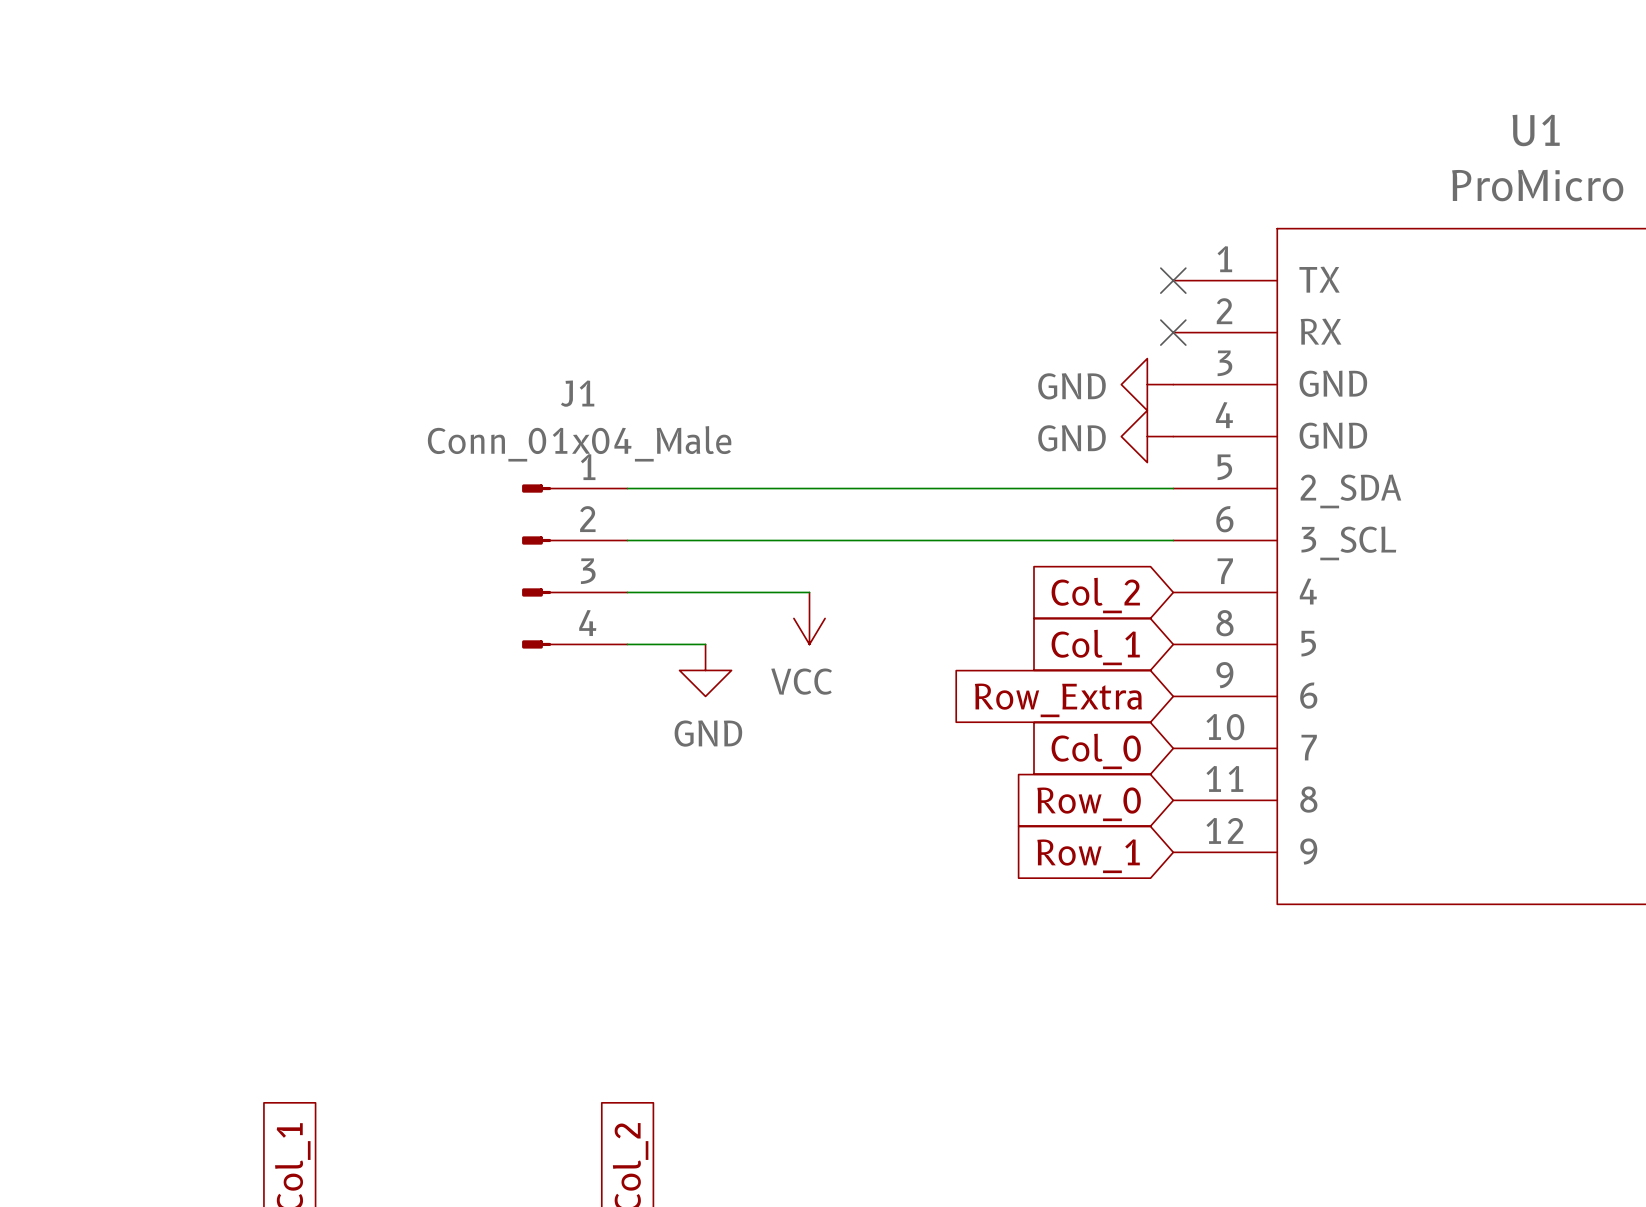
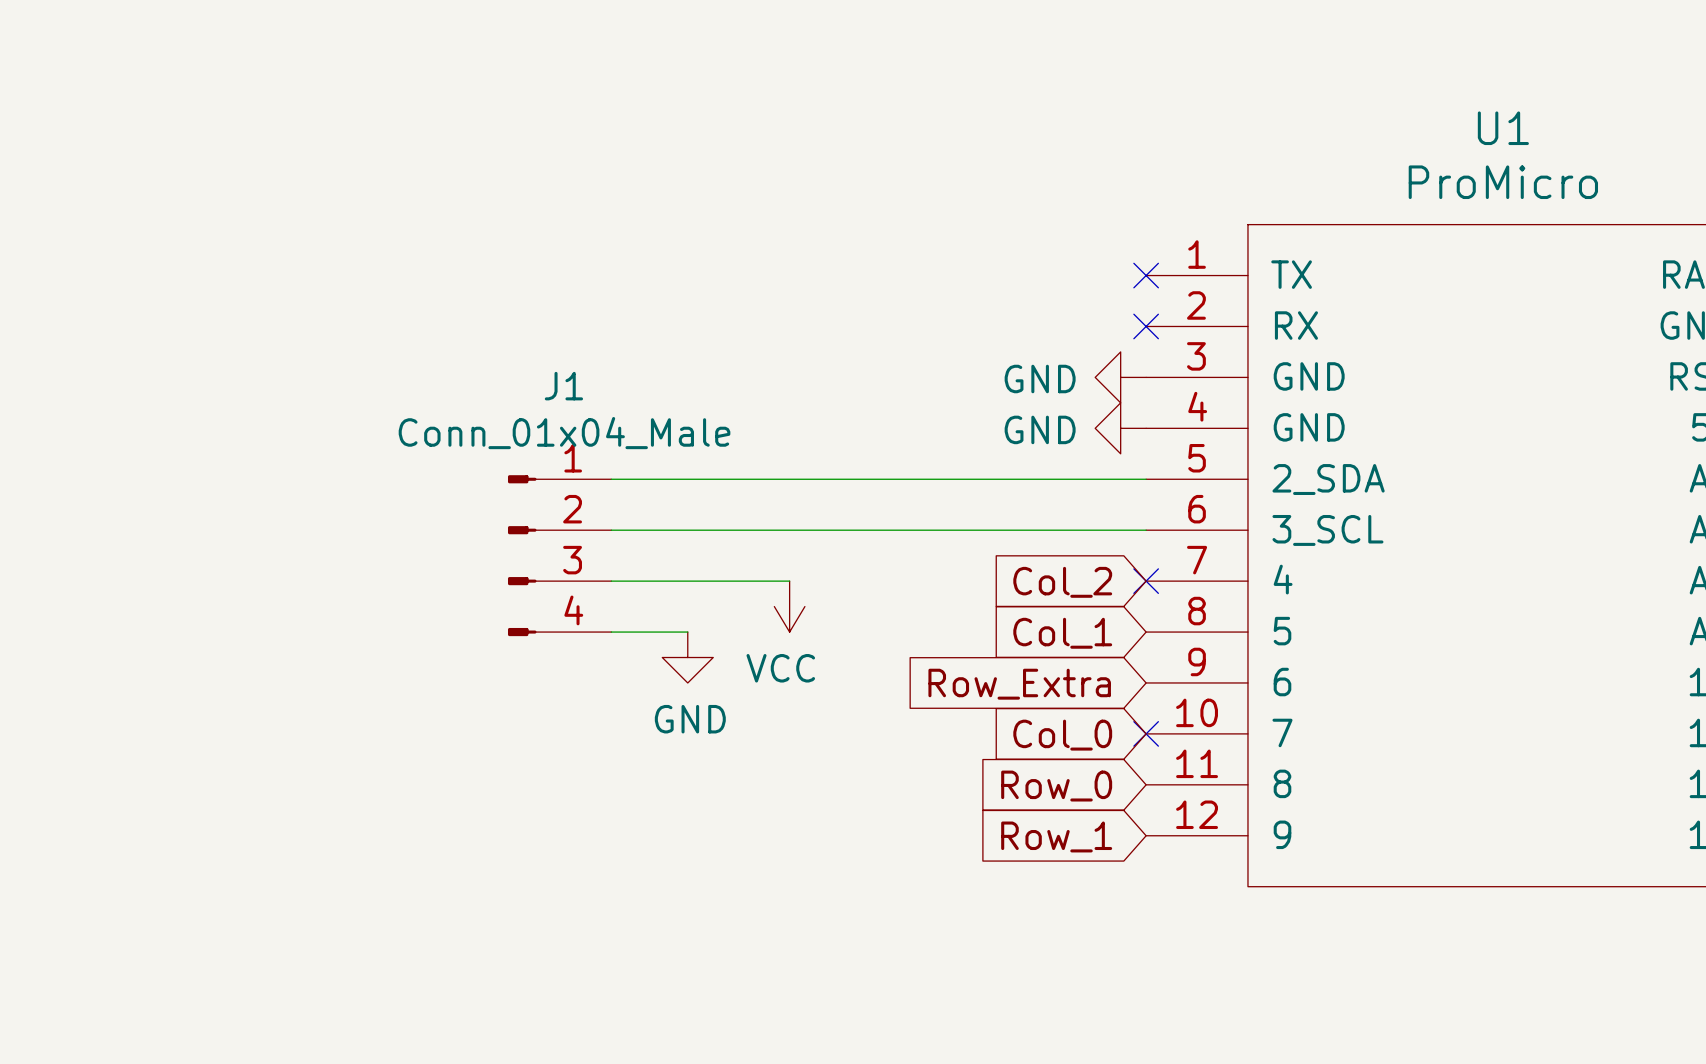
no-connect mark: none -> (1146, 581)
no-connect mark: none -> (1146, 733)

